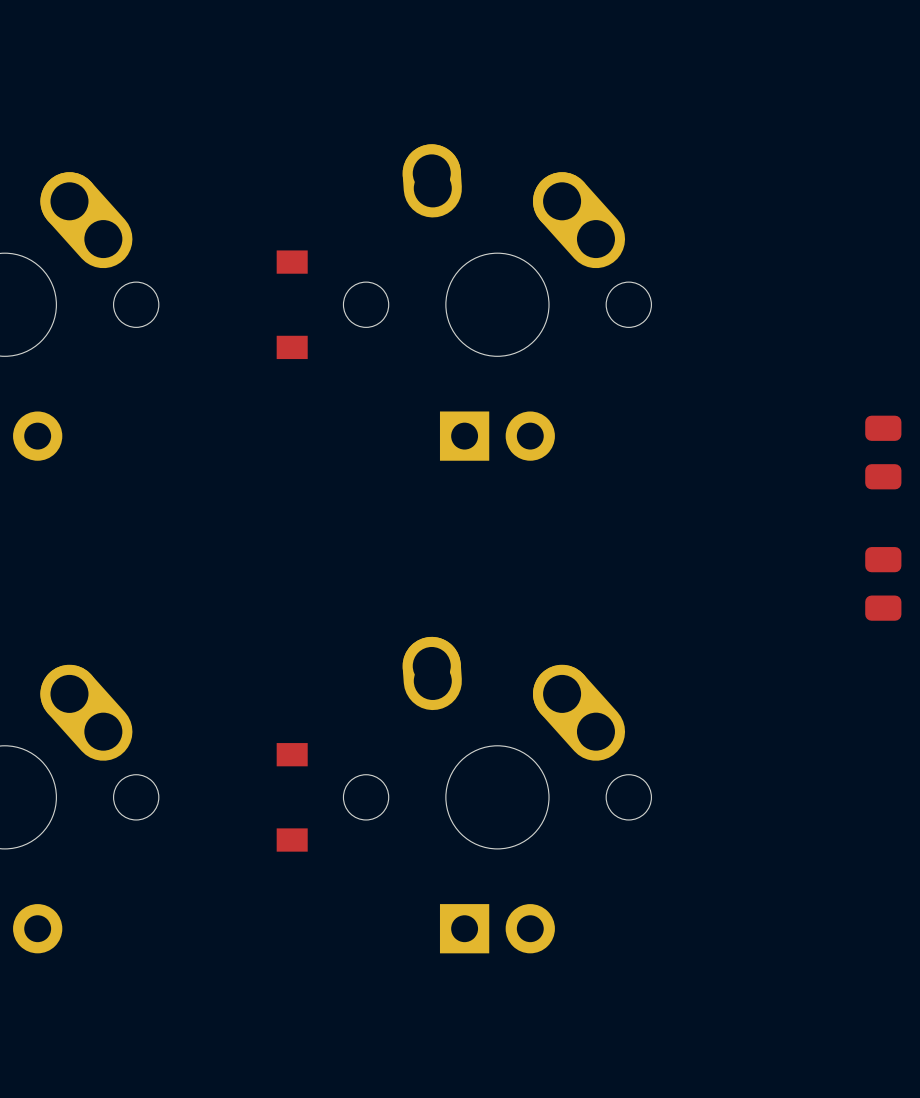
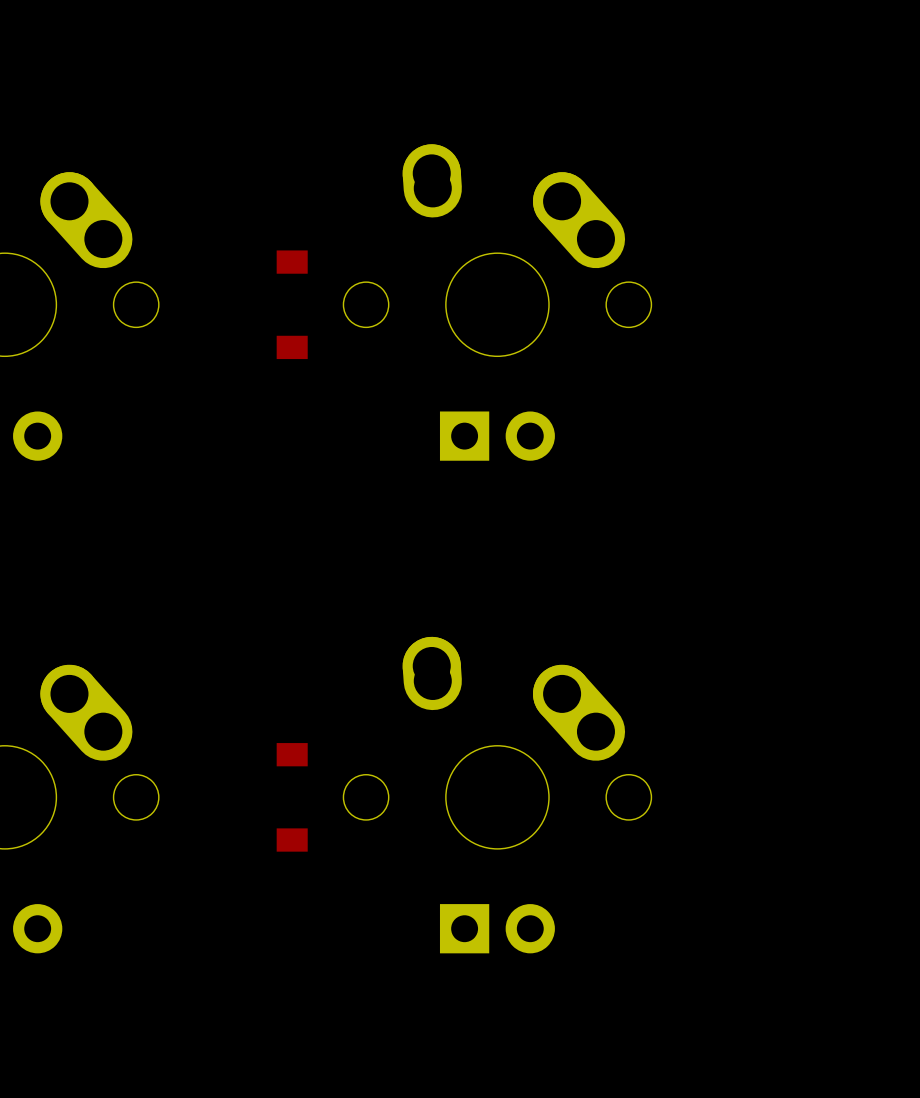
part: (883, 452) -> none
part: (883, 583) -> none

